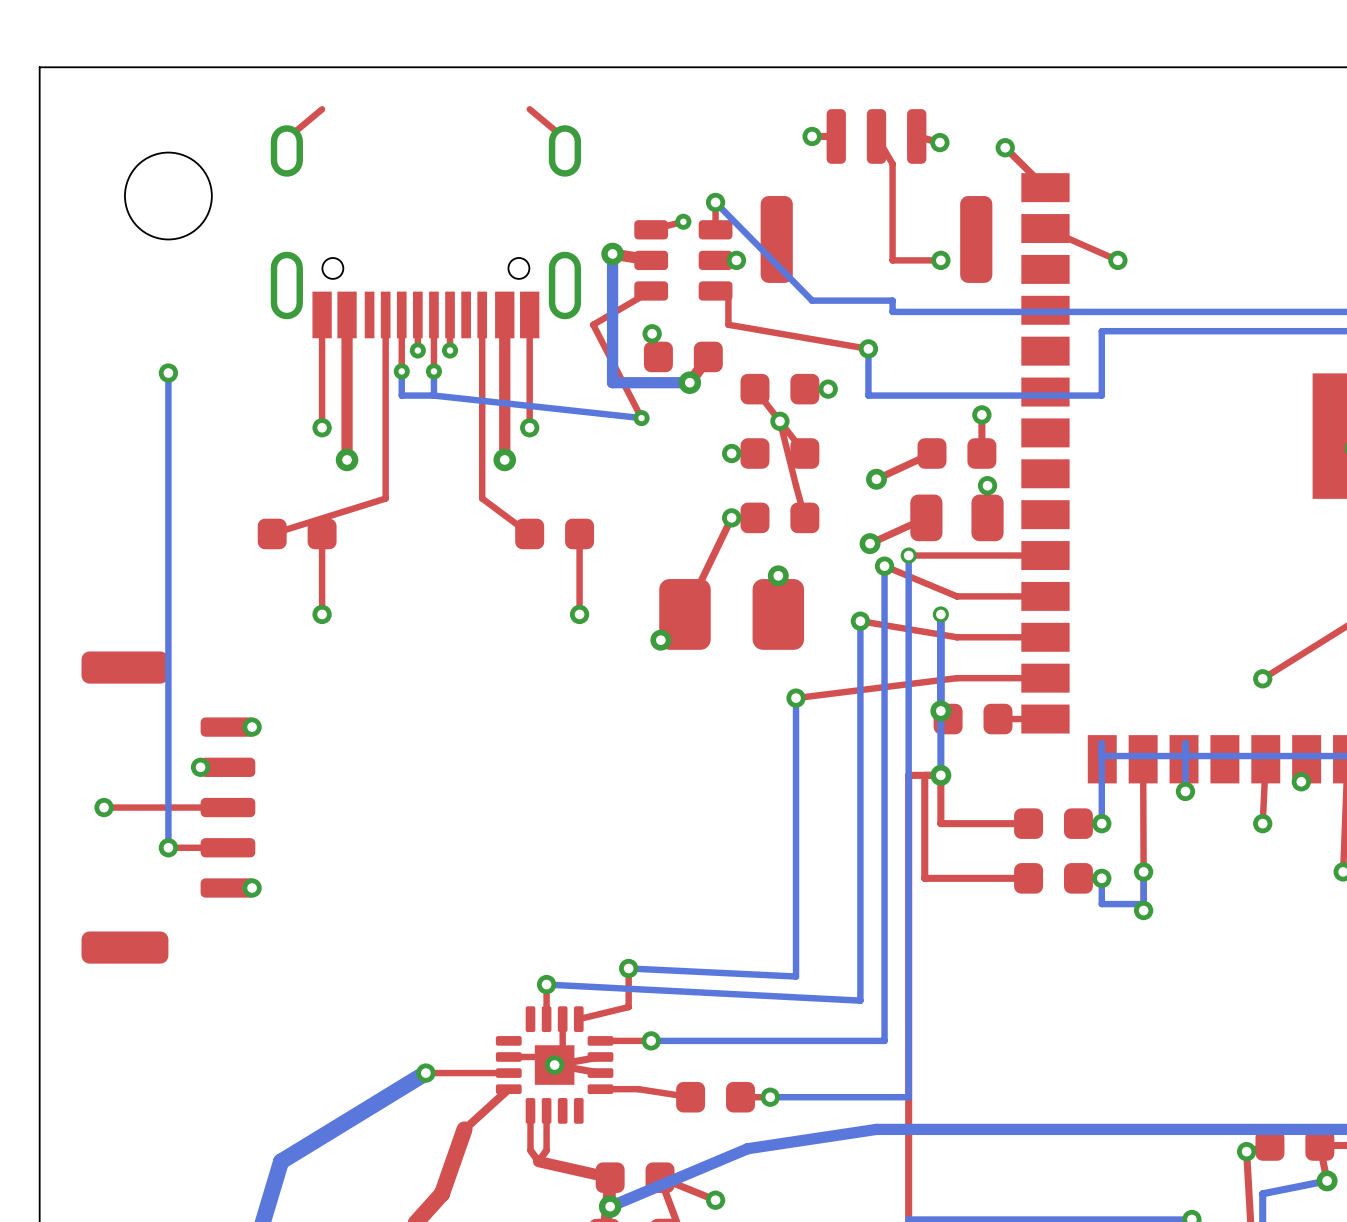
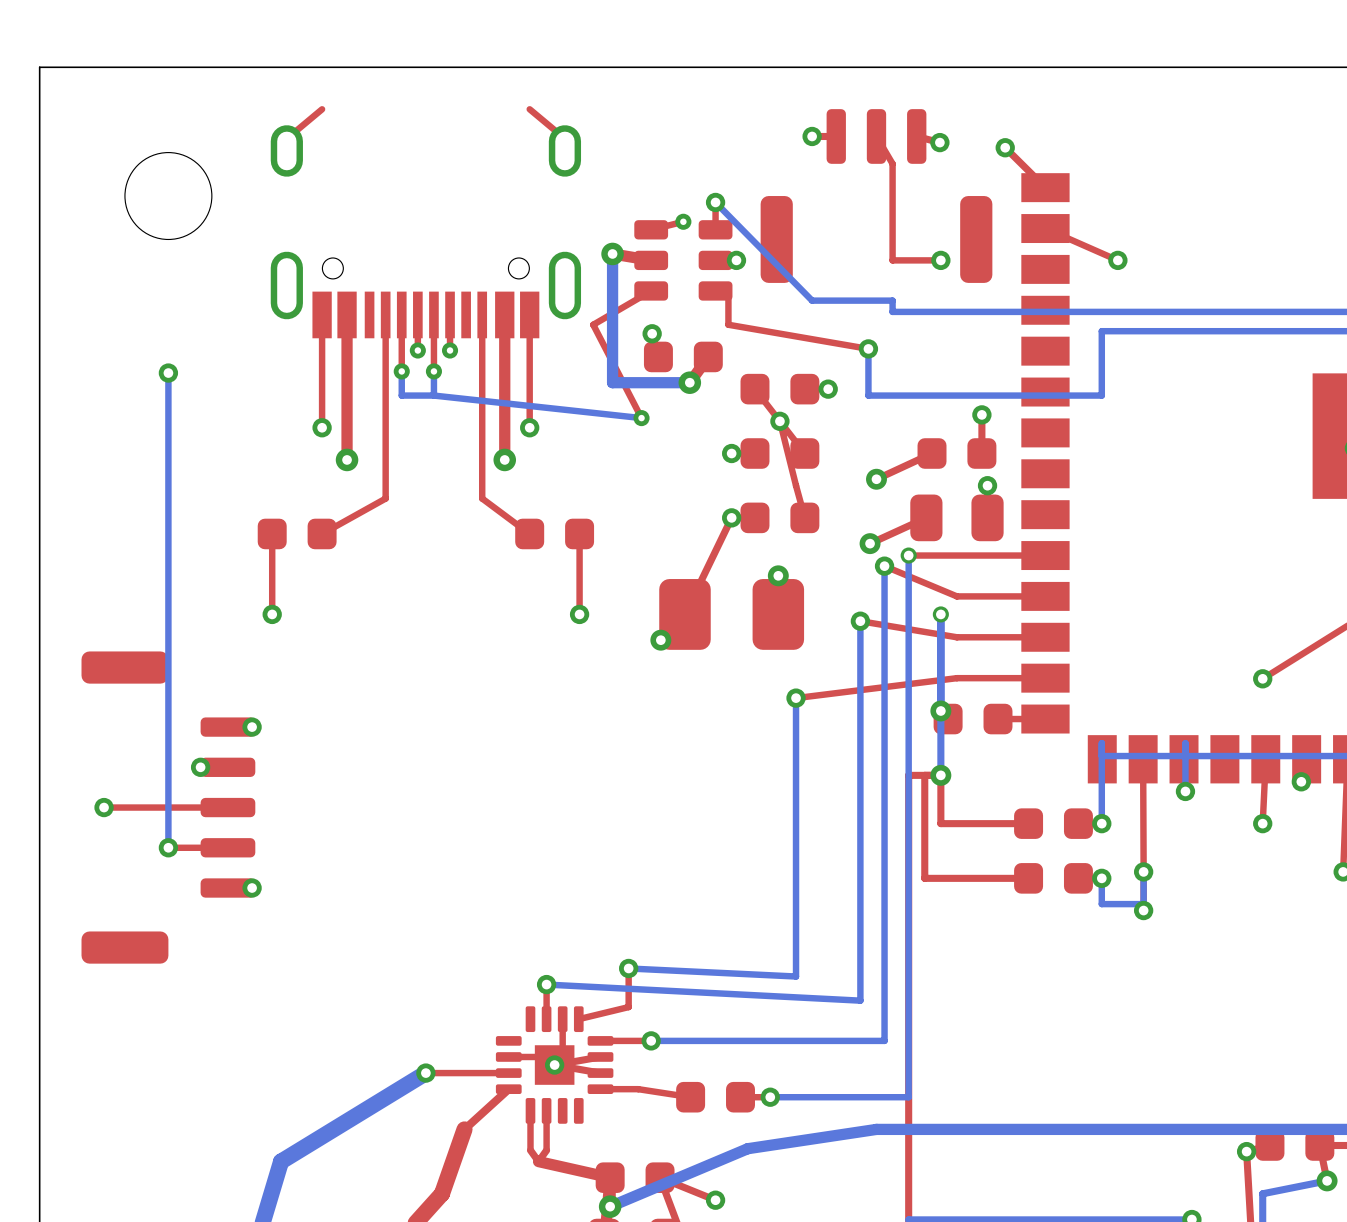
top track: (385, 498) (272, 533) -> (385, 498) (322, 533)
top track: (322, 533) (322, 614) -> (272, 533) (272, 614)
via position: (322, 614) -> (272, 614)

